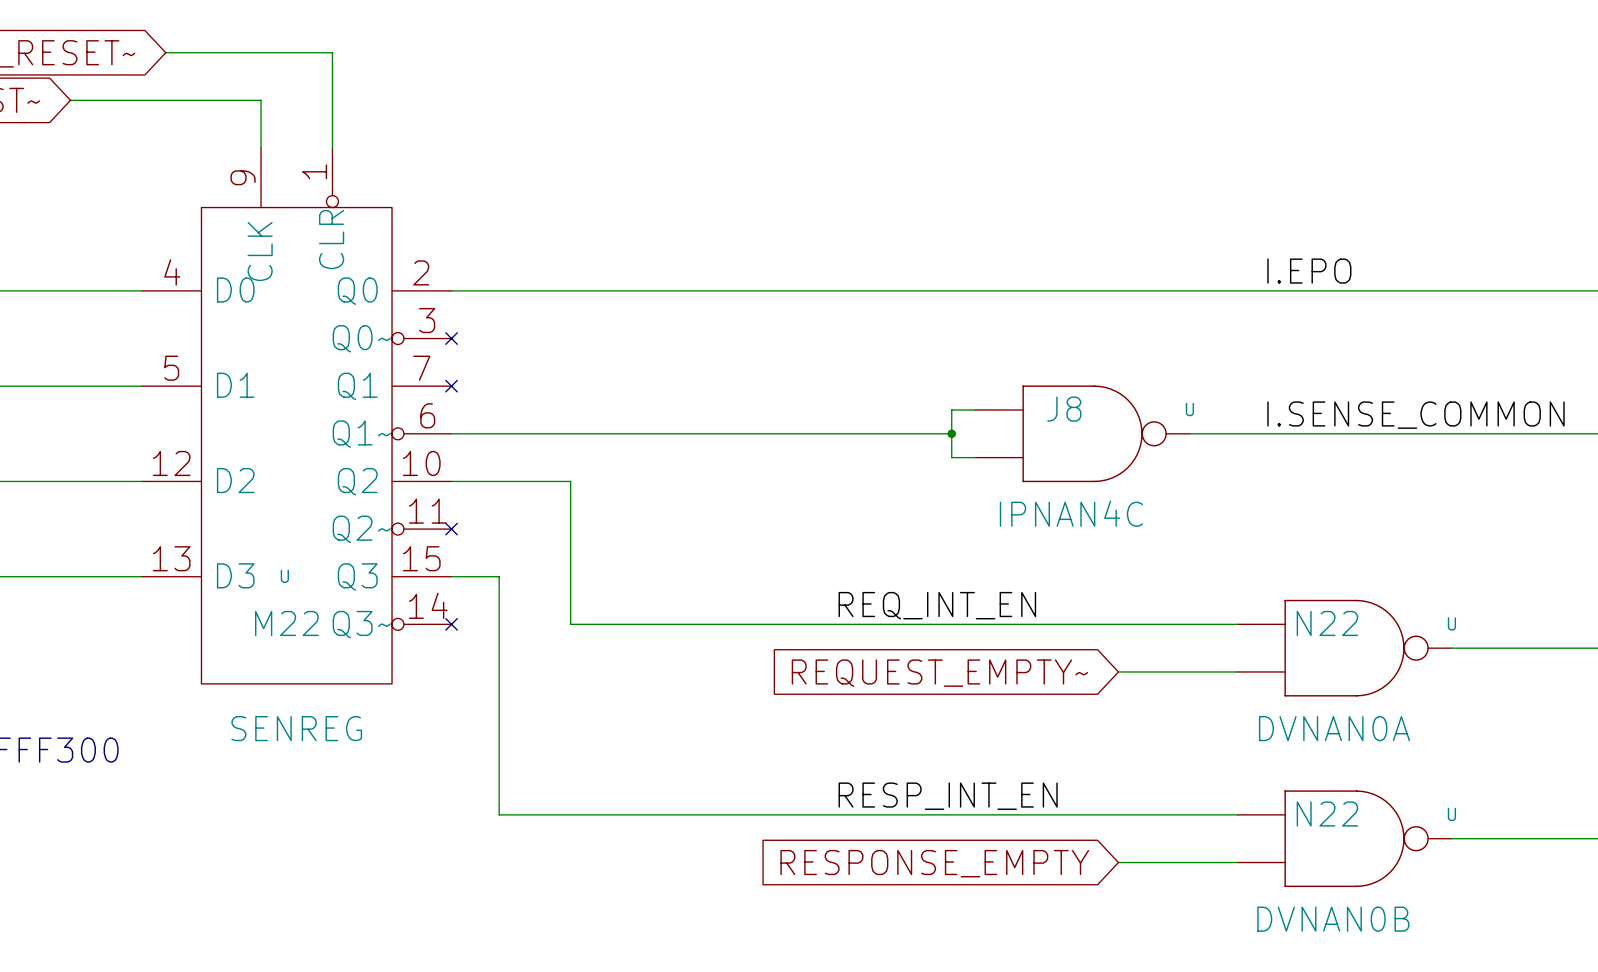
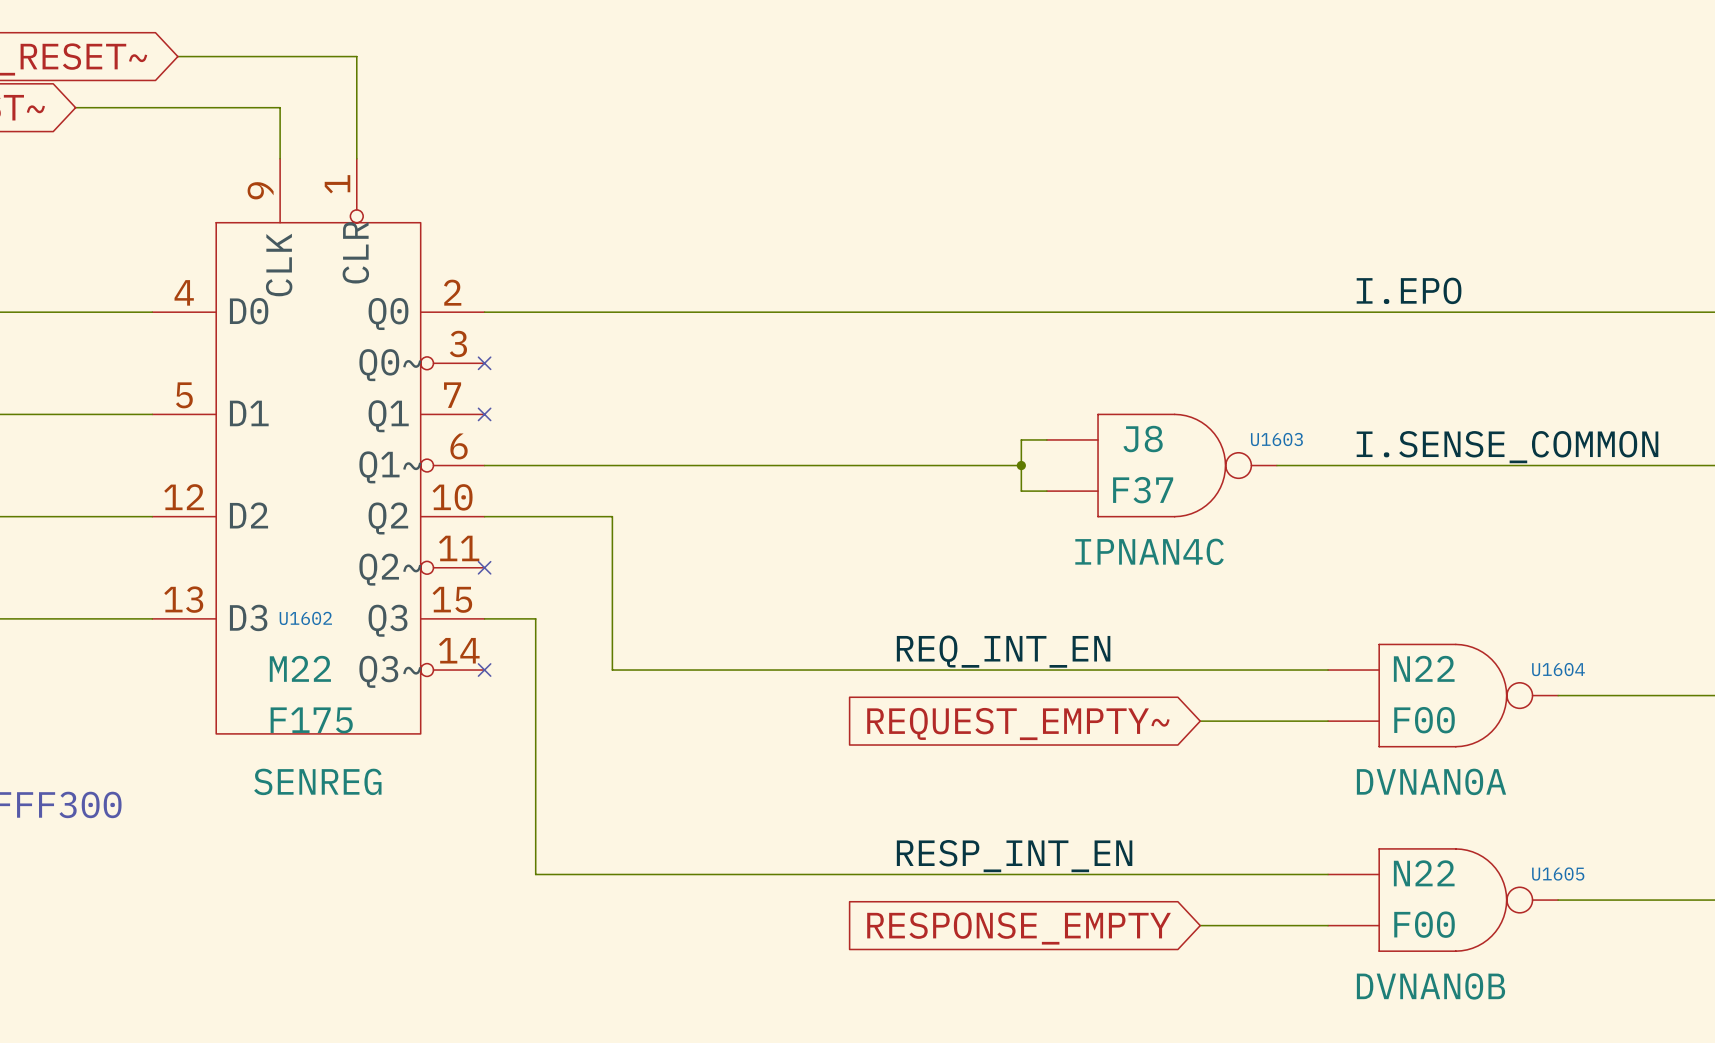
U name: U (1189, 409) -> U1603 (1276, 439)
U value: none -> F37 (1143, 490)
U name: U (284, 576) -> U1602 (305, 618)
U name: U (1451, 623) -> U1604 (1558, 669)
U value: none -> F175 (311, 720)
U value: none -> F00 (1424, 720)
U name: U (1451, 814) -> U1605 (1558, 874)
U value: none -> F00 (1424, 924)

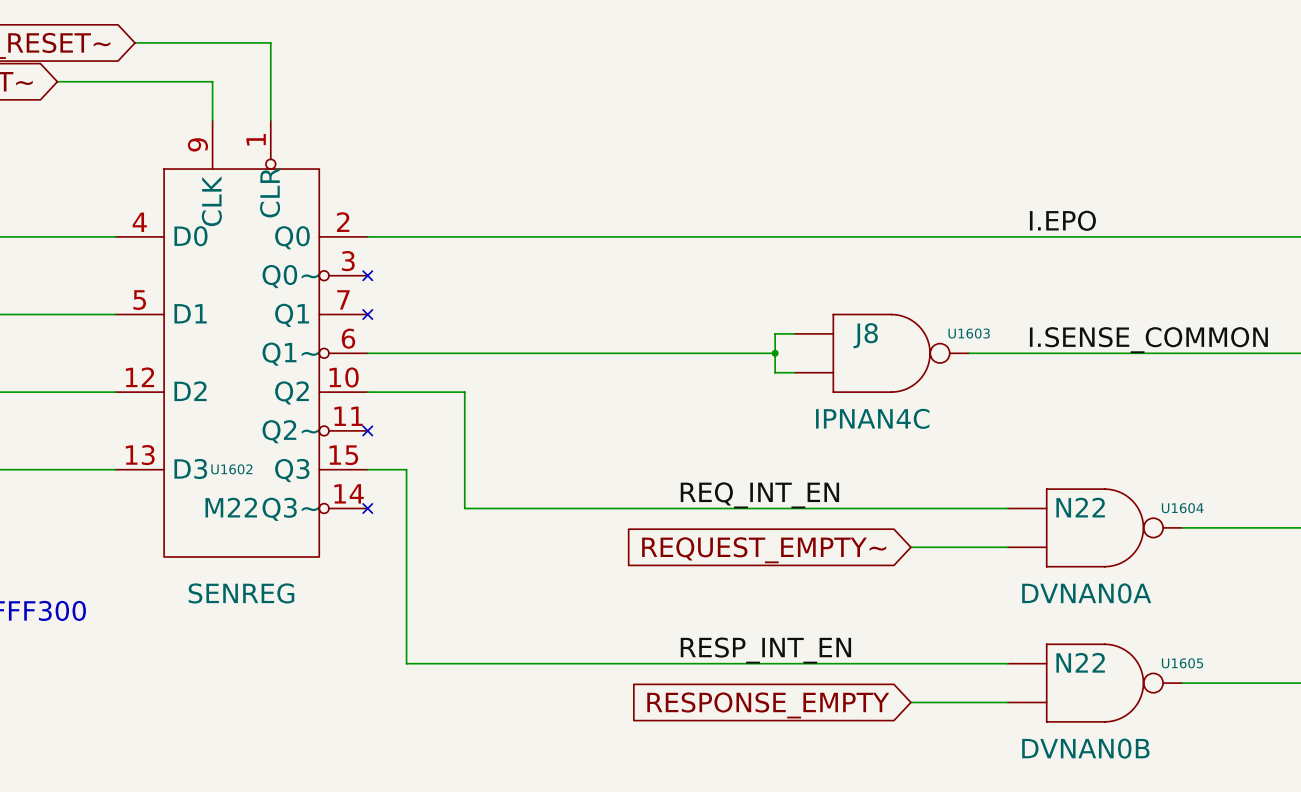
U1603 value: F37 (1143, 490) -> none
U1602 value: F175 (311, 720) -> none
U1604 value: F00 (1424, 720) -> none
U1605 value: F00 (1424, 924) -> none

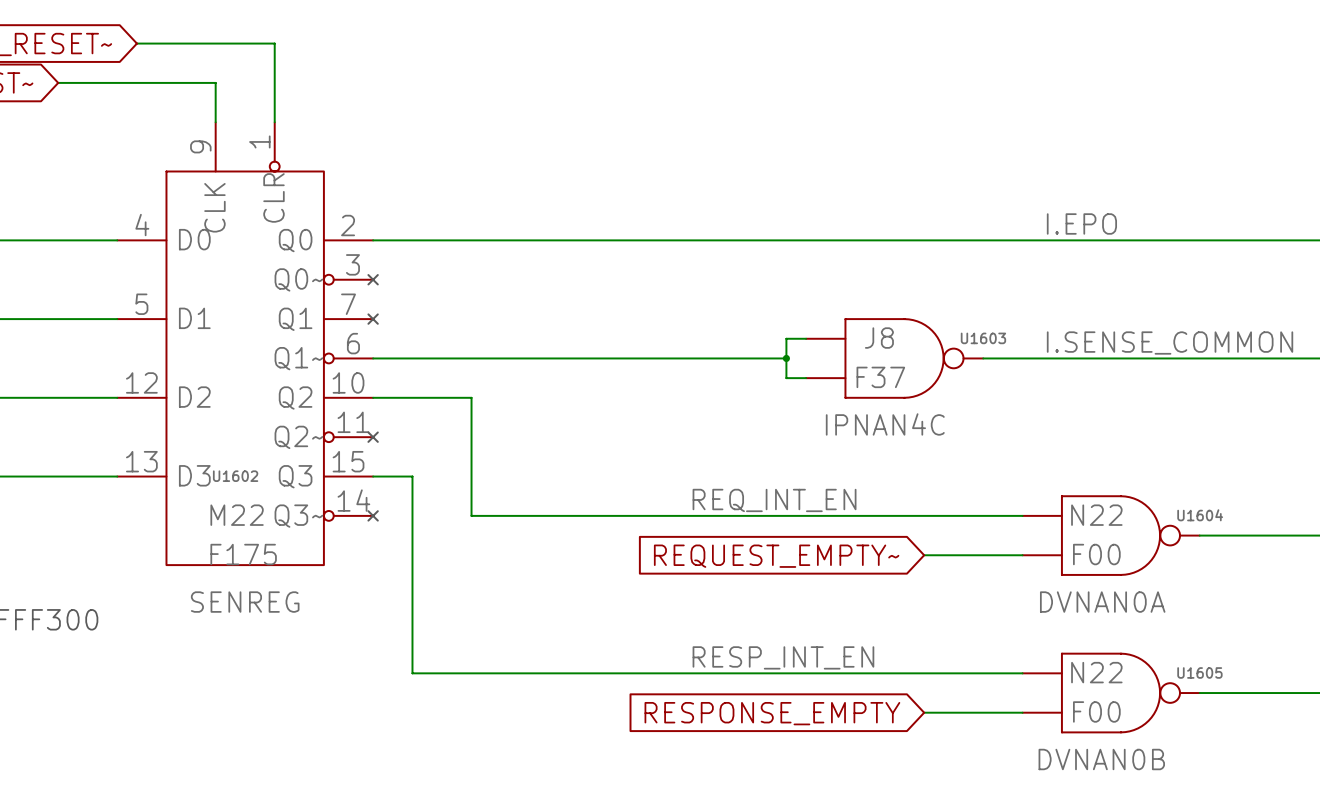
U1603 value: none -> F37 (880, 377)
U1602 value: none -> F175 (243, 554)
U1604 value: none -> F00 (1096, 554)
U1605 value: none -> F00 (1096, 711)

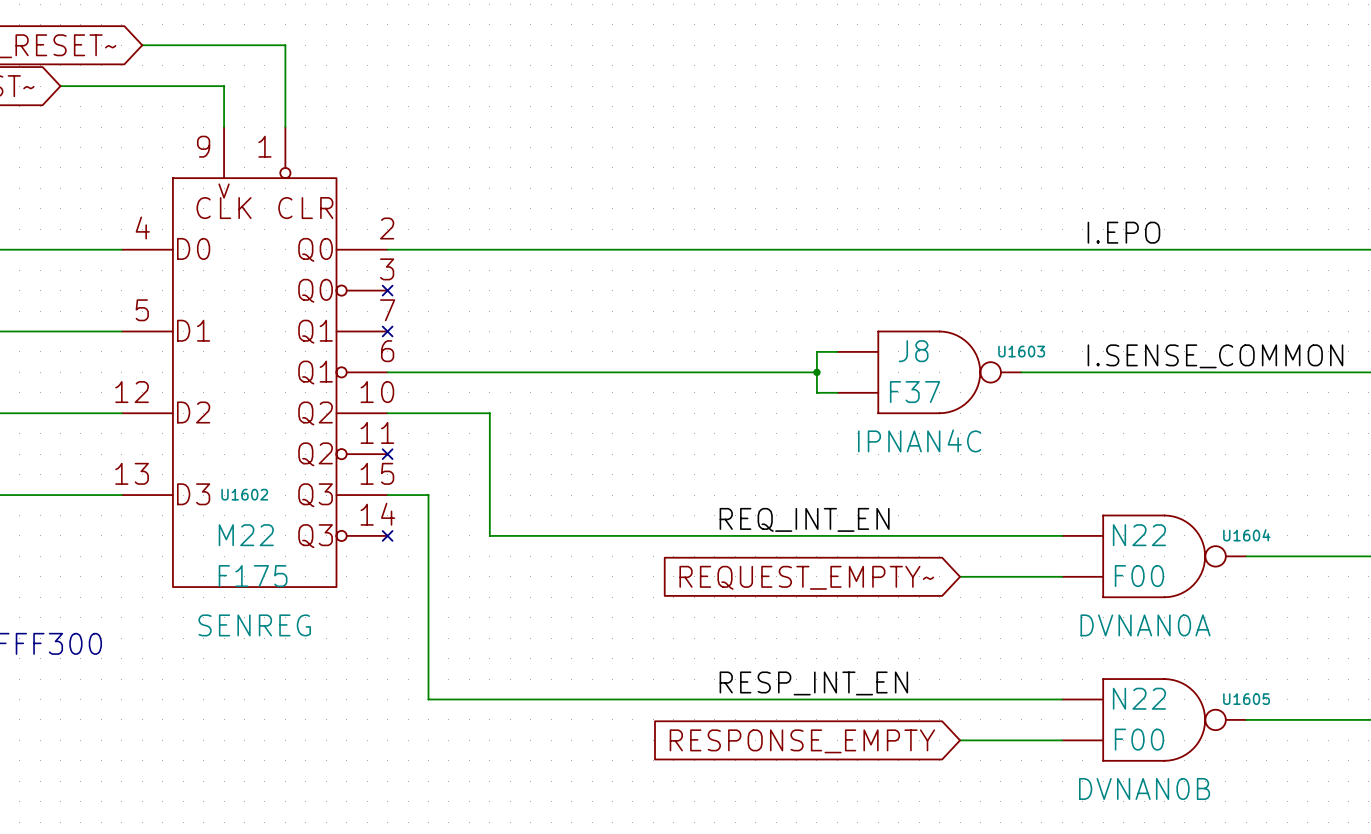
U1602 symbol: [117, 122, 374, 566] -> [121, 127, 388, 588]

